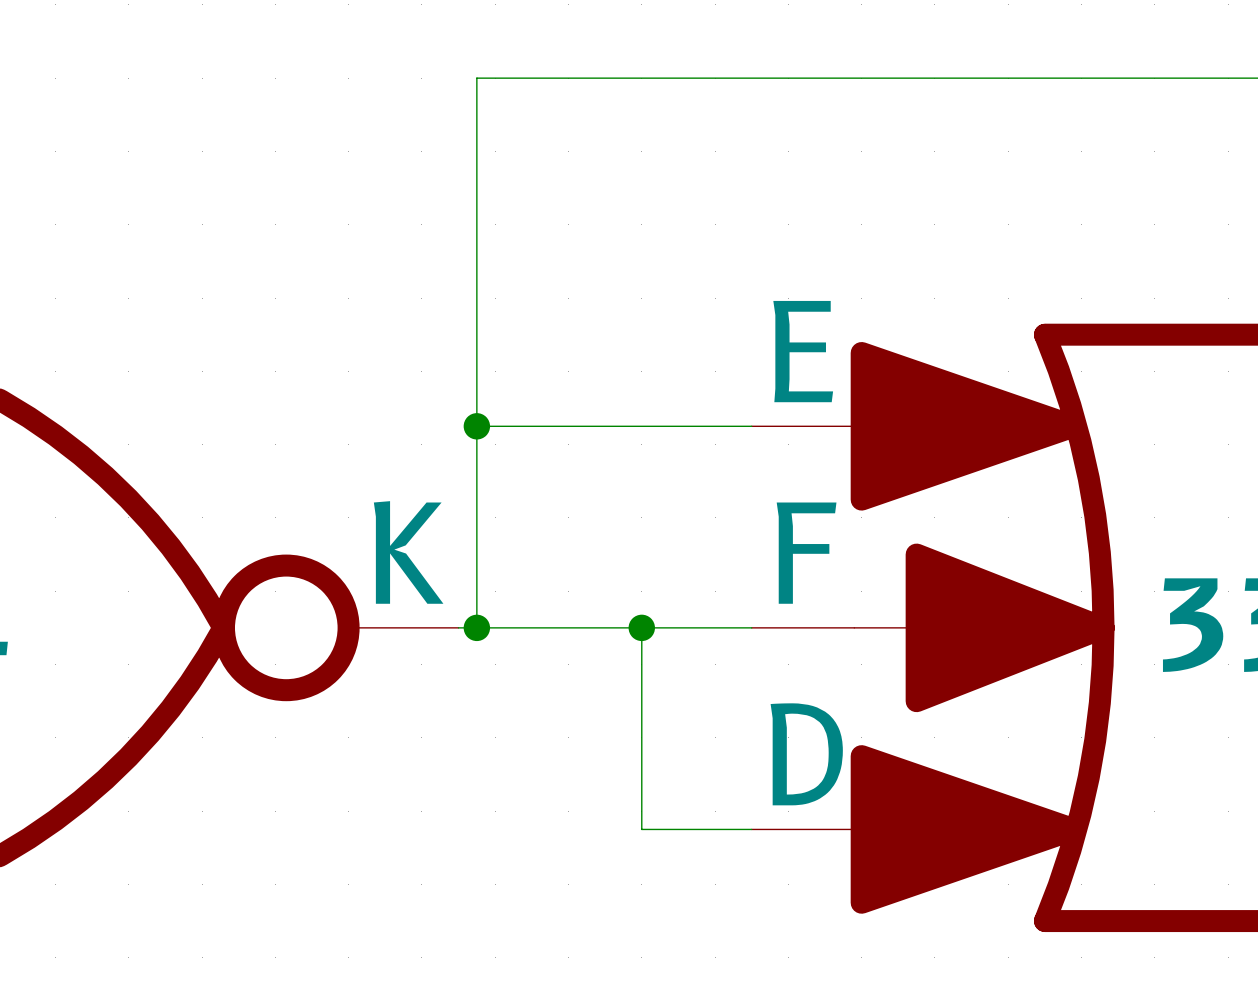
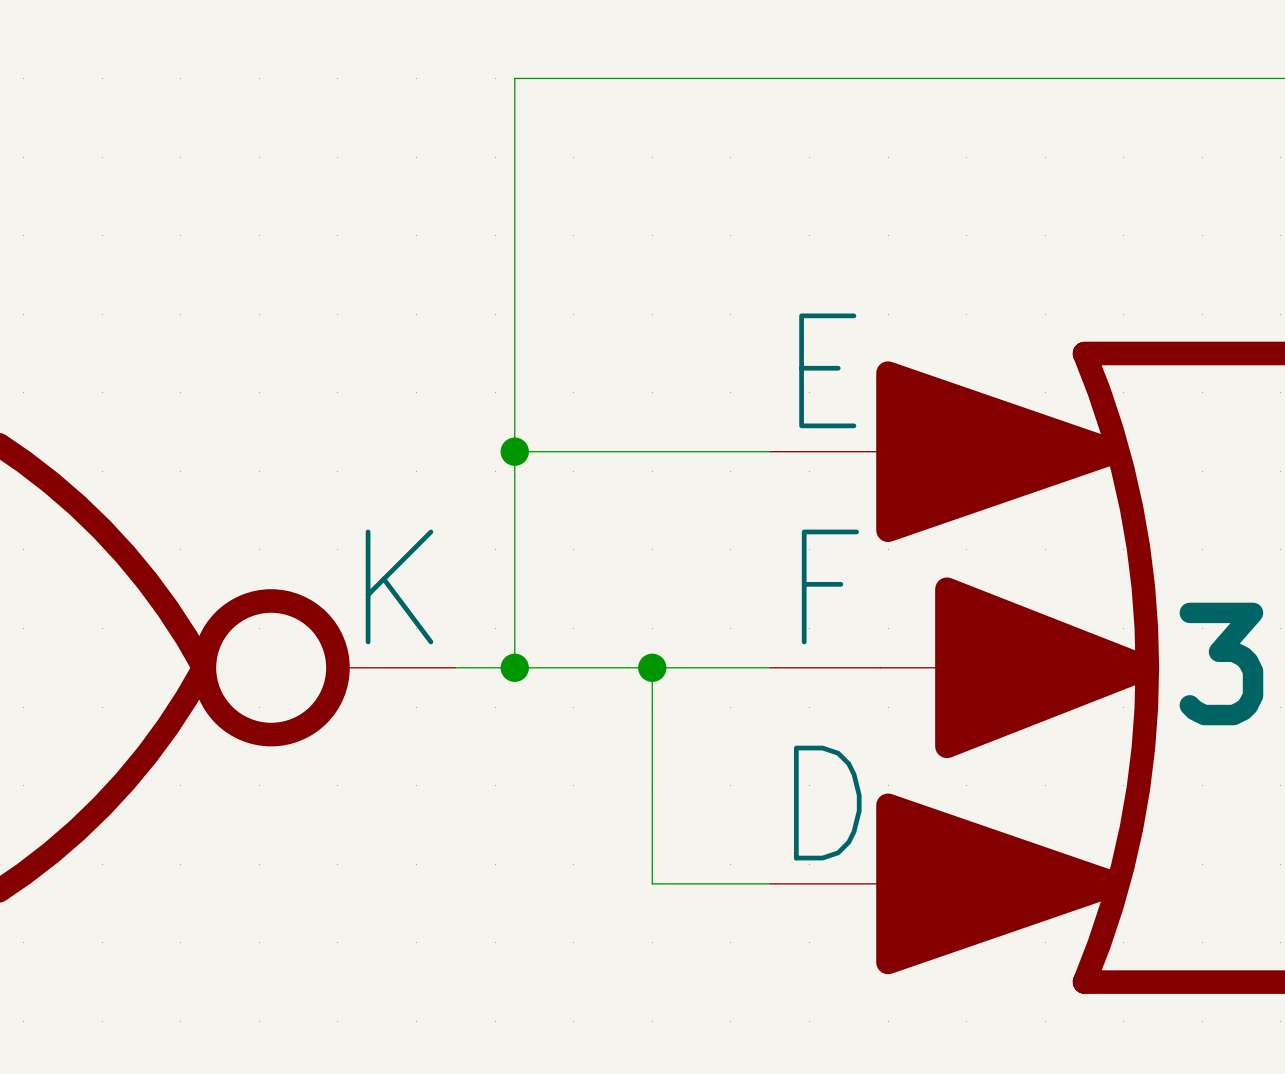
wire: (513, 78) (476, 78) (476, 627) -> (514, 78) (514, 667)
wire: (476, 426) (513, 426) -> none
junction position: (476, 426) -> (514, 451)
junction position: (476, 627) -> (514, 667)

